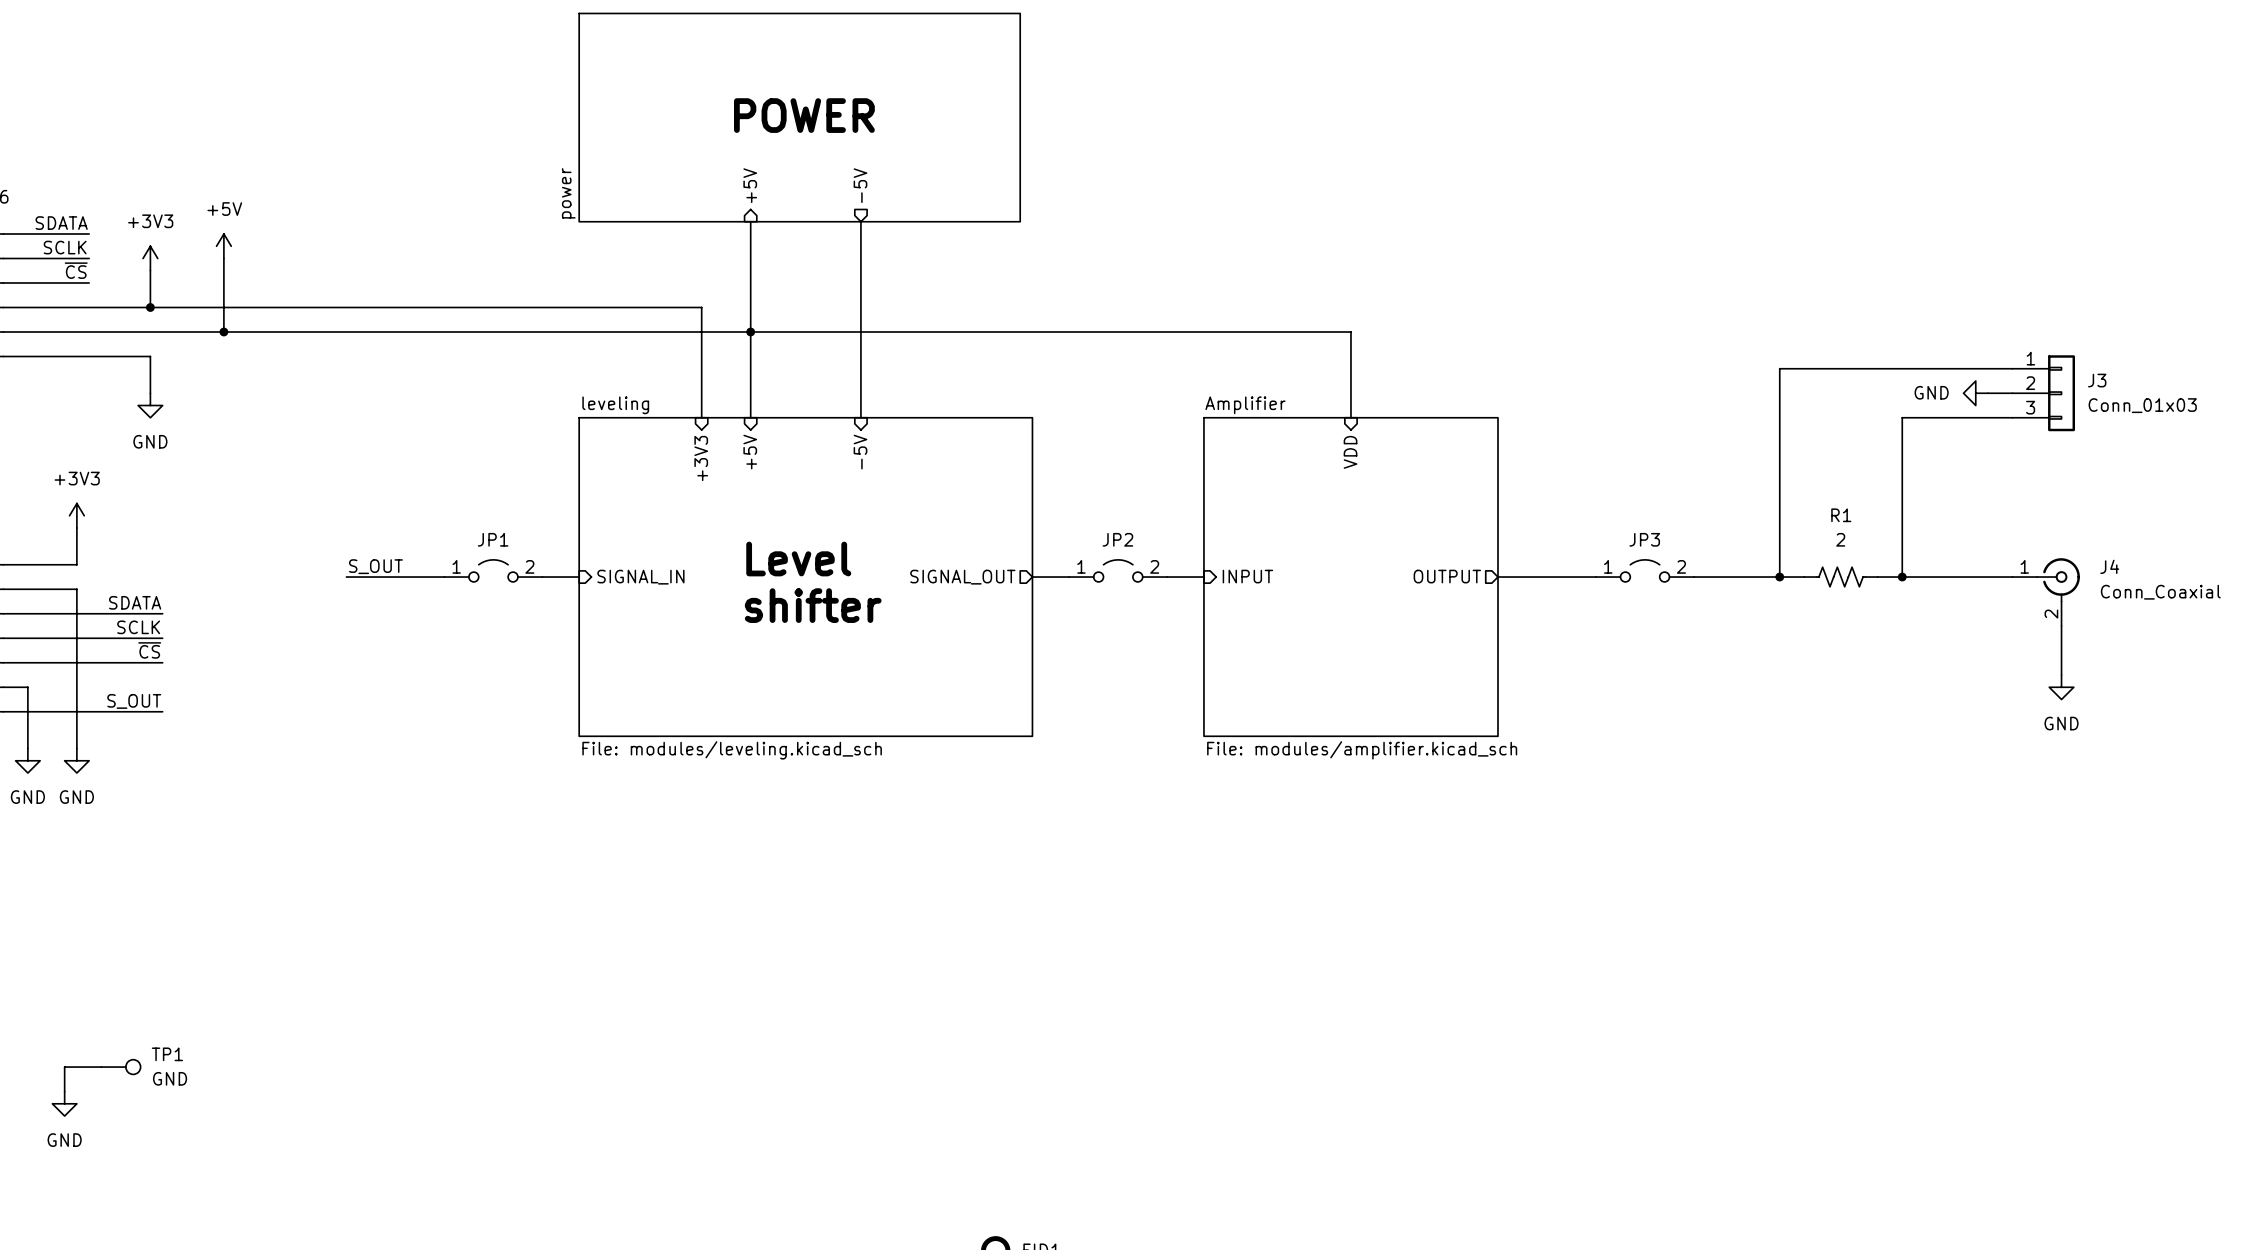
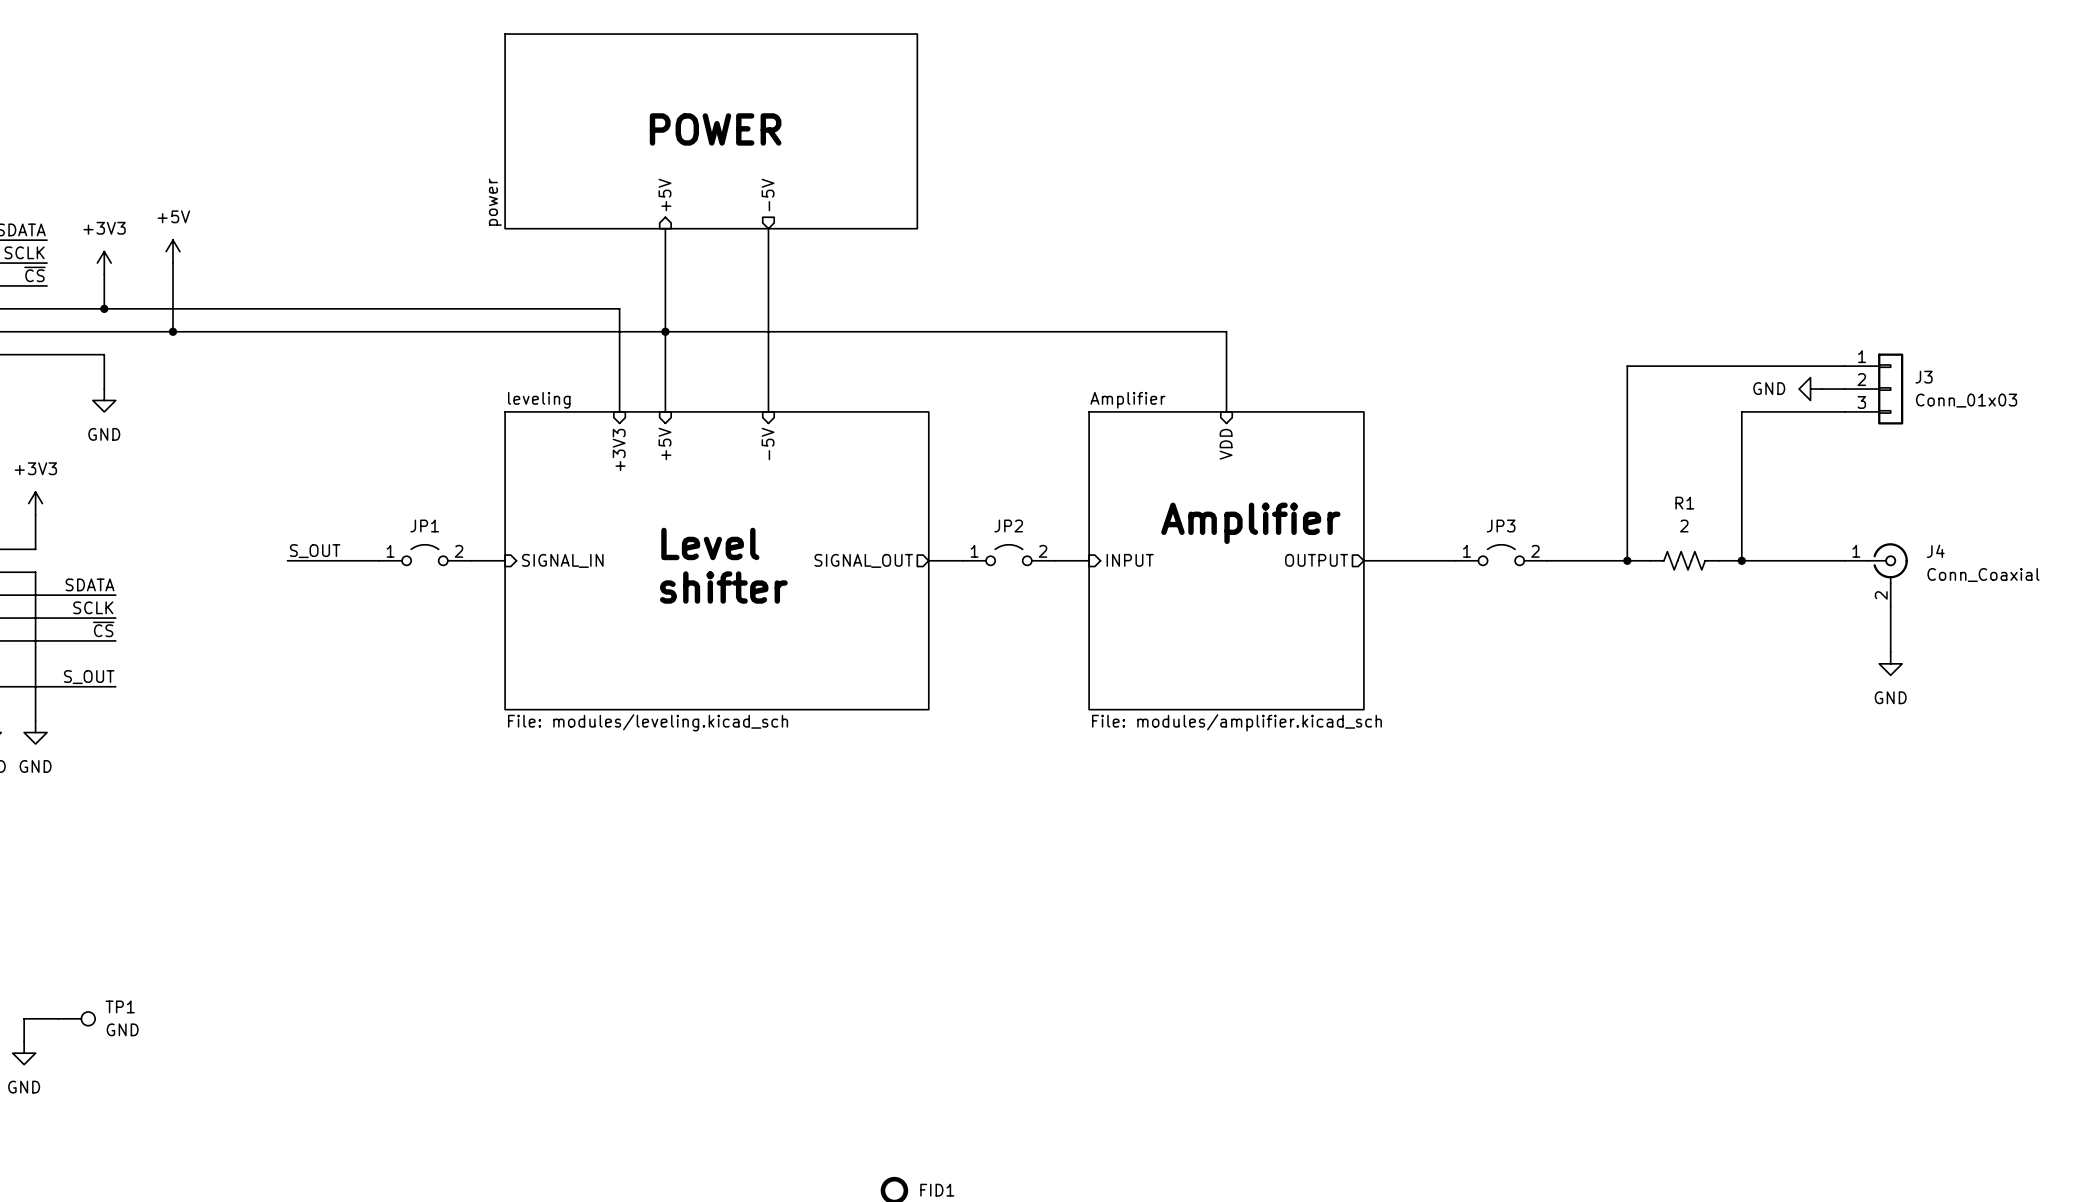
text: none -> Amplifier (1250, 523)

